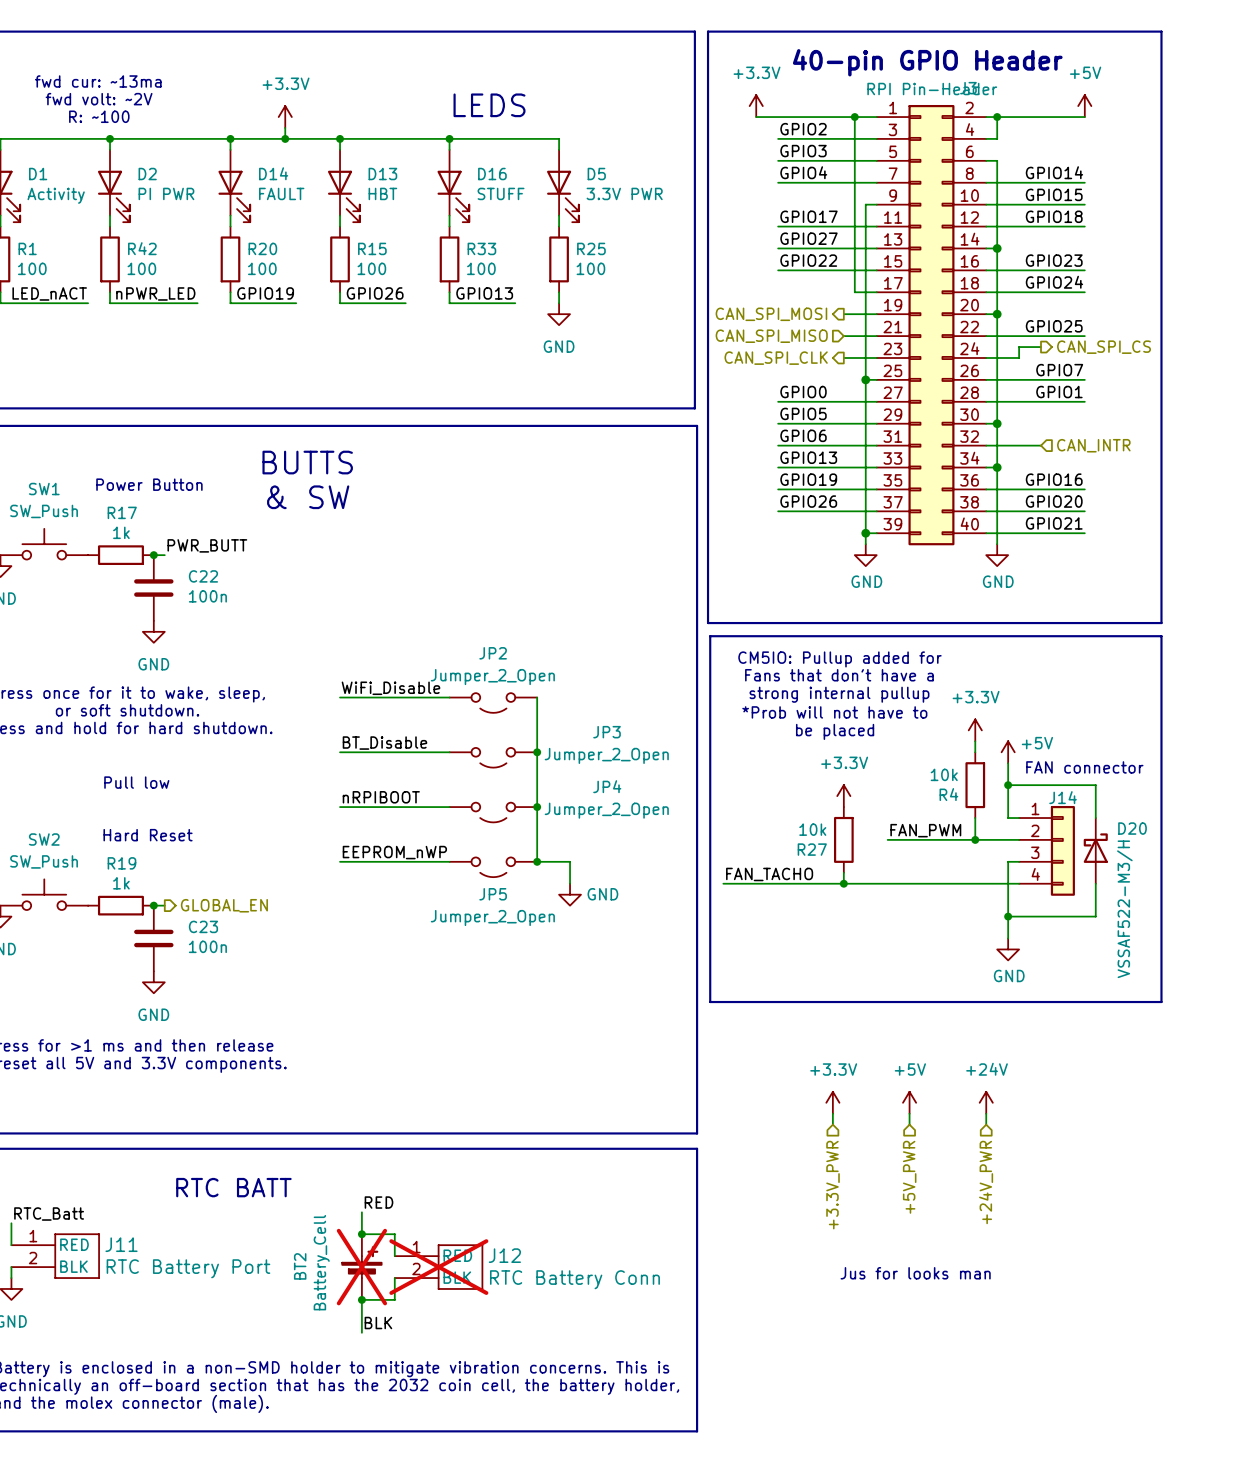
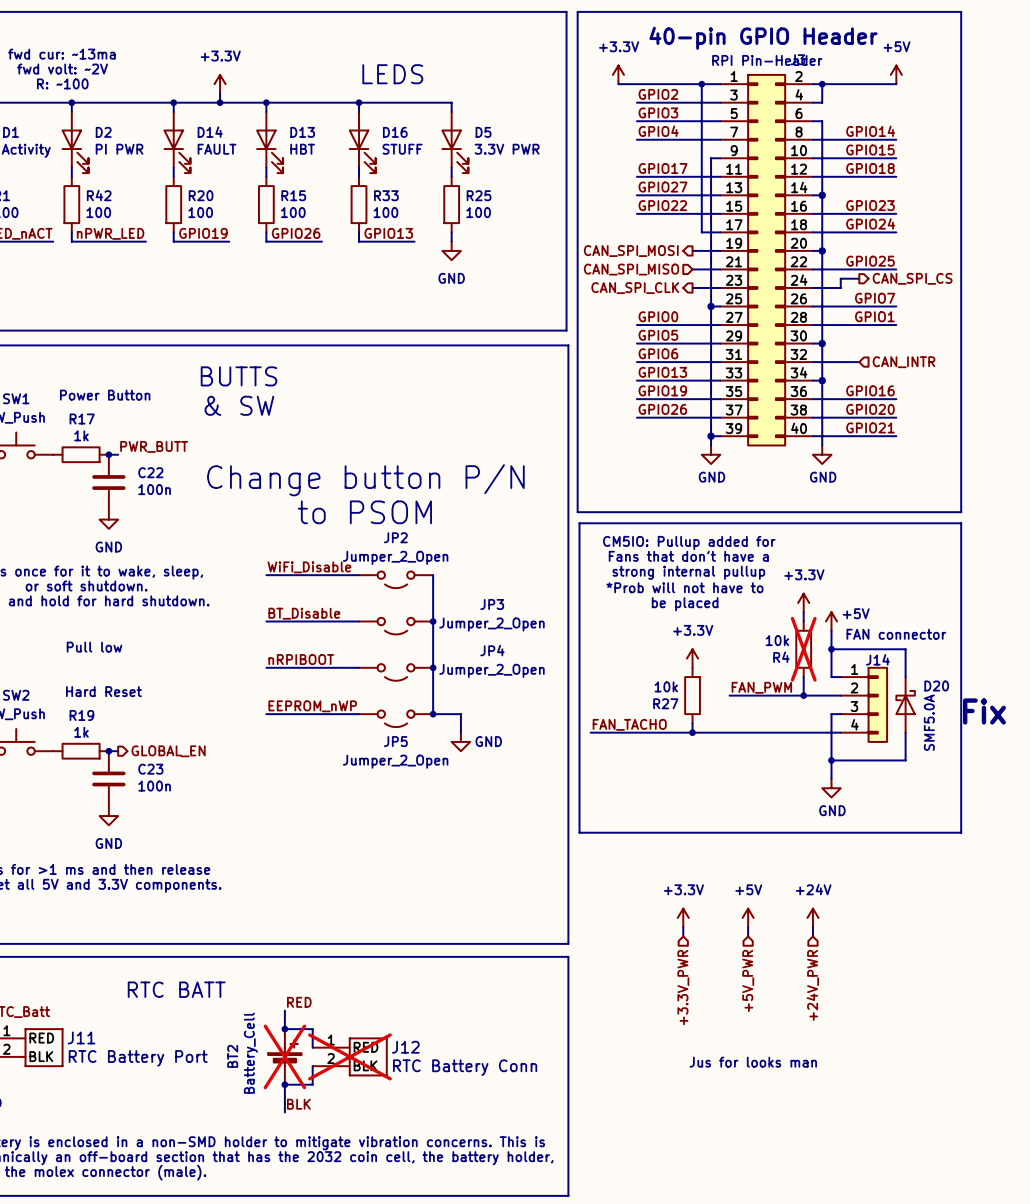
text: none -> Change button P/N (365, 480)
text: none -> to PSOM (364, 512)
R4 do-not-place cross: none -> (803, 649)
text: none -> Fix (984, 711)
D20 value: VSSAF522-M3/H (1124, 909) -> SMF5.0A (929, 722)

